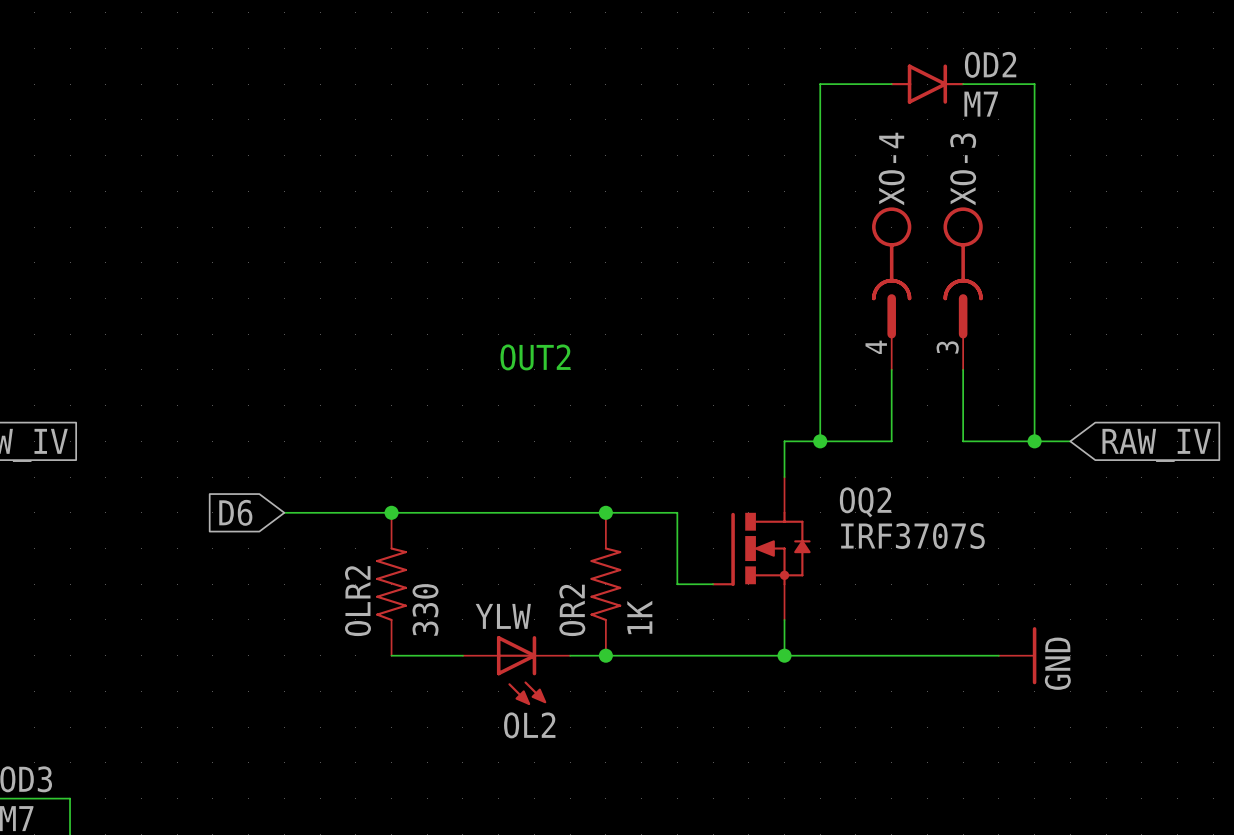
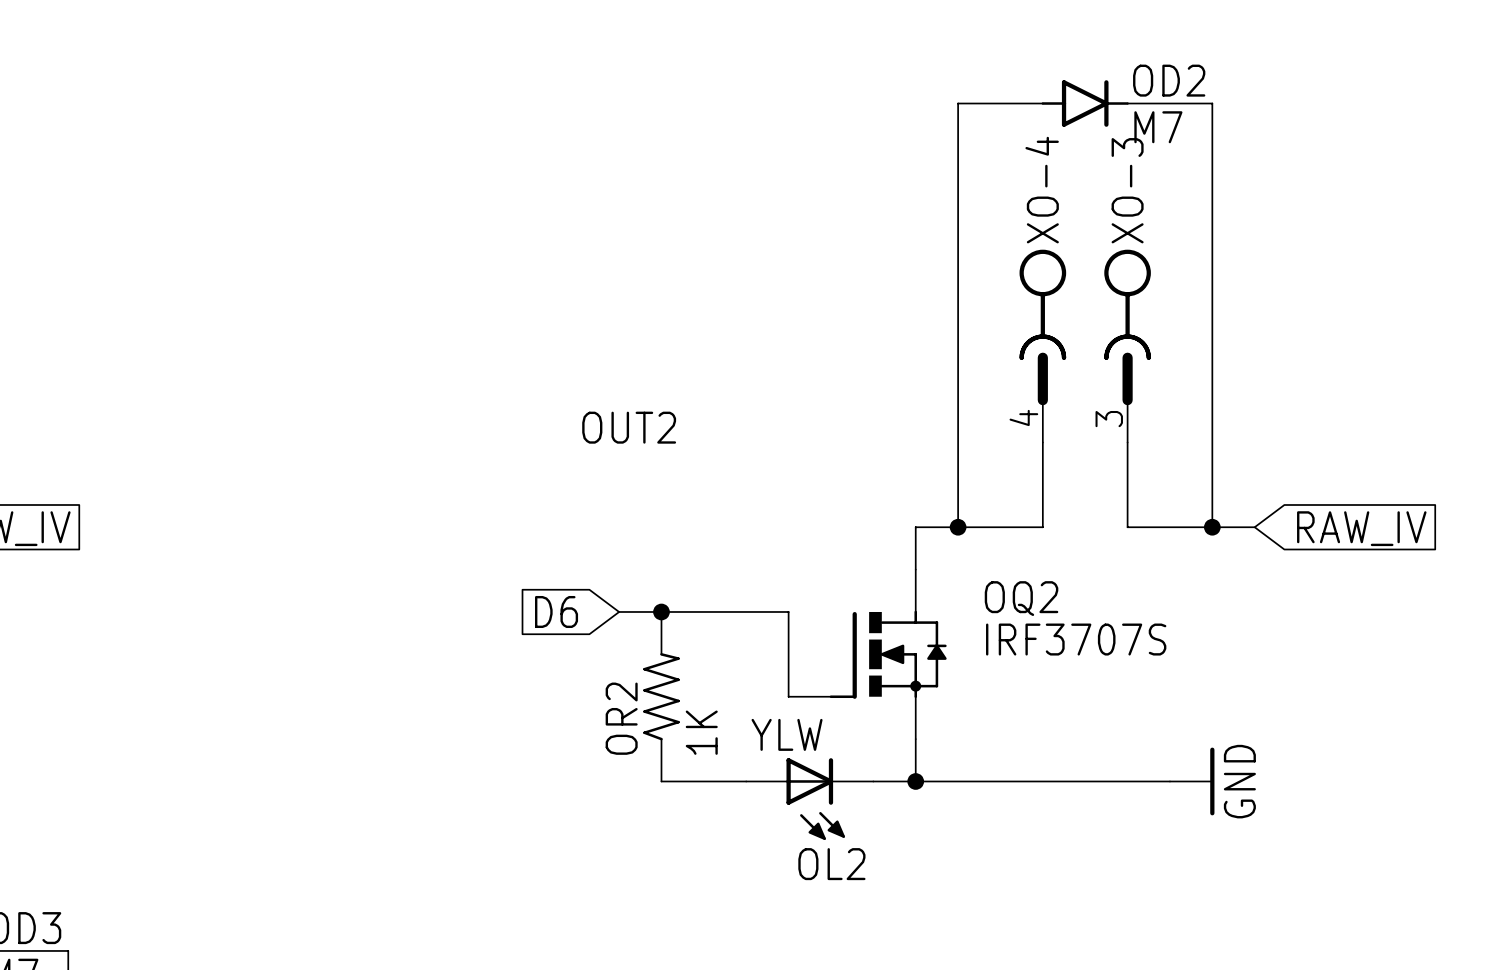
global label position: D6 (235, 512) -> D6 (556, 611)
wire: (284, 512) (534, 512) -> none
junction: (391, 512) -> none
junction position: (605, 512) -> (661, 611)
OLR2: 330 (391, 584) -> none
OR2 position: (605, 584) -> (661, 696)
wire: (391, 655) (462, 655) -> none
junction: (605, 655) -> none
OL2 position: (516, 670) -> (809, 799)

